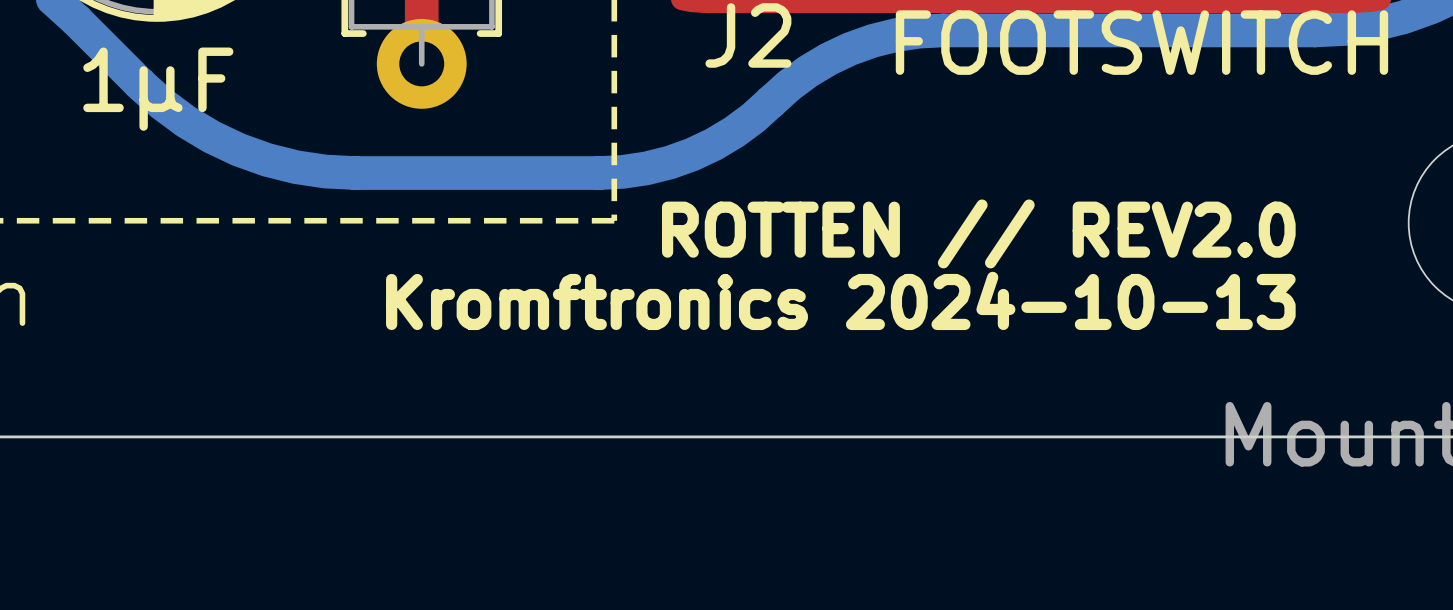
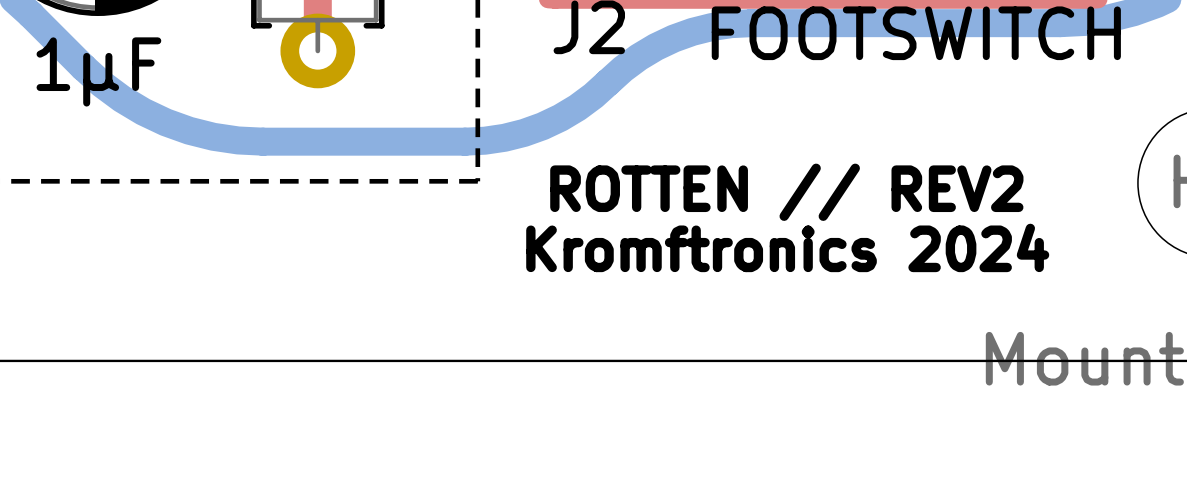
text: ROTTEN // REV2.0 (978, 233) -> ROTTEN // REV2 (786, 192)
text: Kromftronics 2024-10-13 (840, 300) -> Kromftronics 2024 (787, 247)

